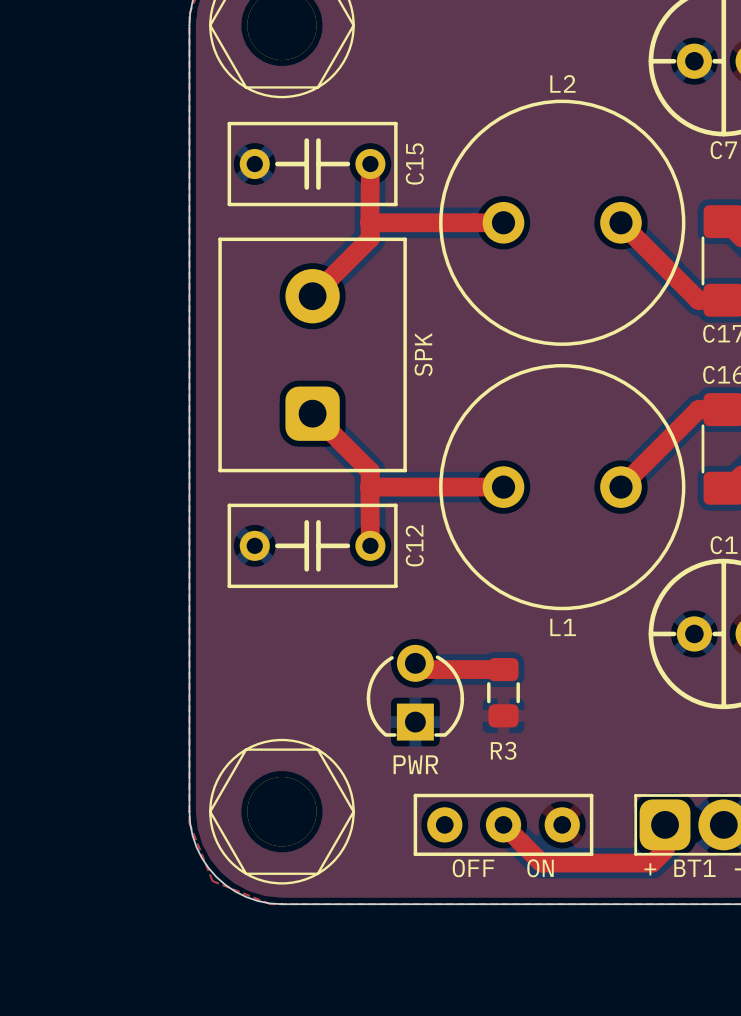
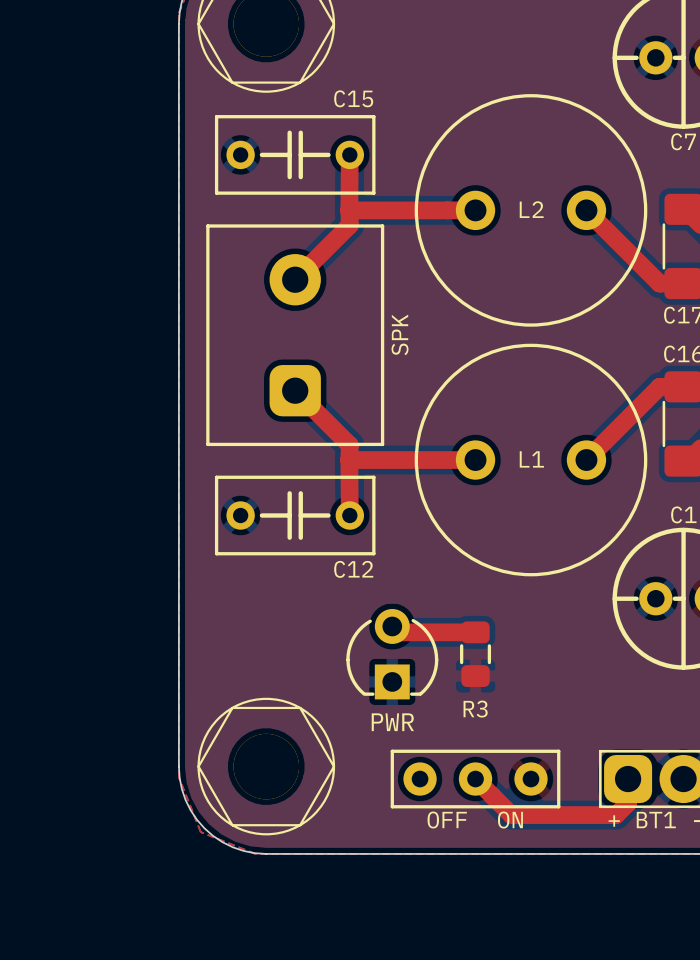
L2 name position: L2 (562, 83) -> L2 (531, 209)
C15 name rotation: 0° (414, 163) -> 90° clockwise (353, 98)
C15 name position: C15 (414, 163) -> C15 (353, 98)
C12 name rotation: 0° (414, 545) -> 90° clockwise (353, 569)
C12 name position: C12 (414, 545) -> C12 (353, 569)
L1 name position: L1 (563, 627) -> L1 (531, 459)

